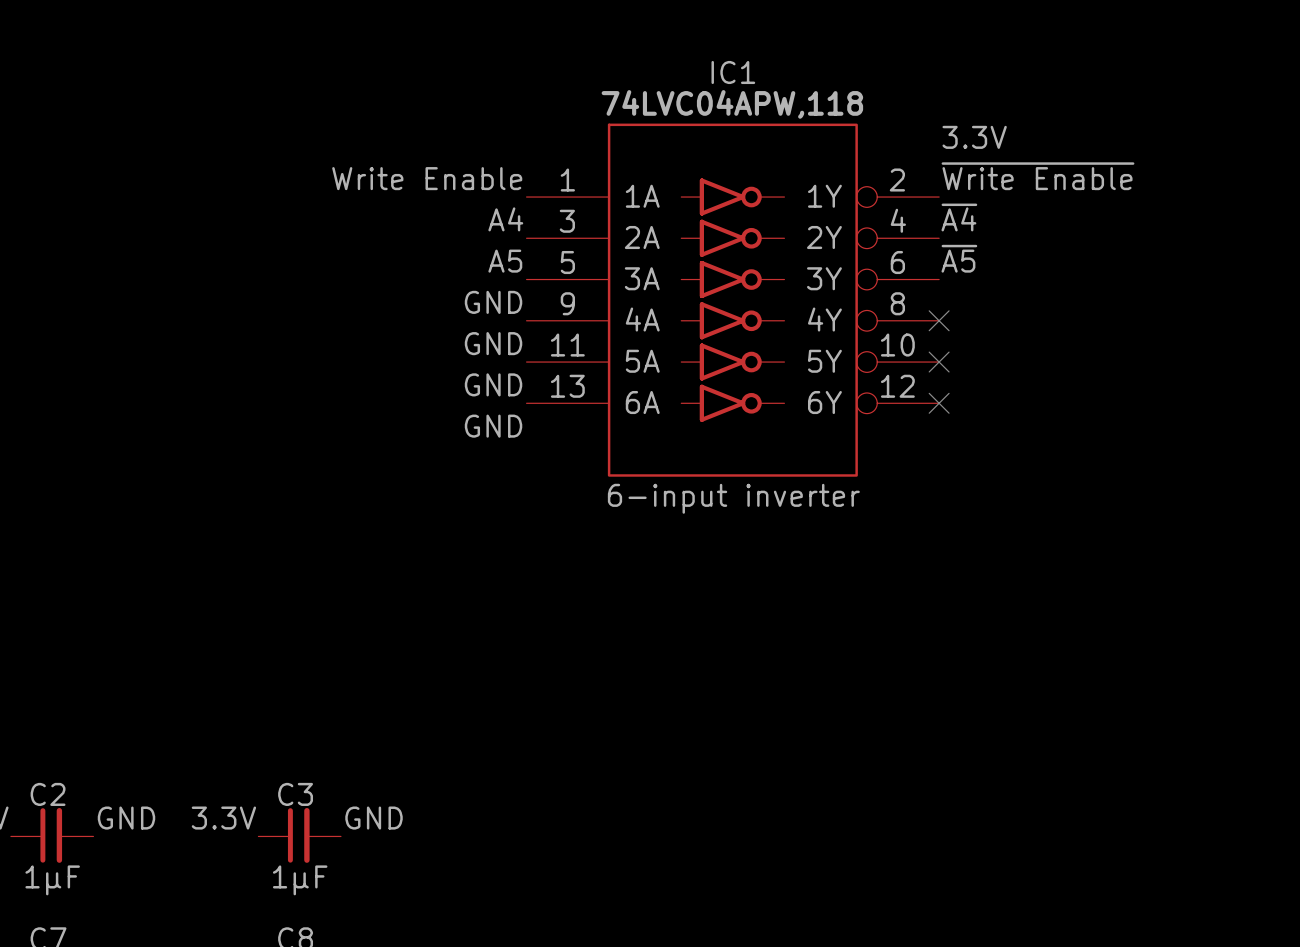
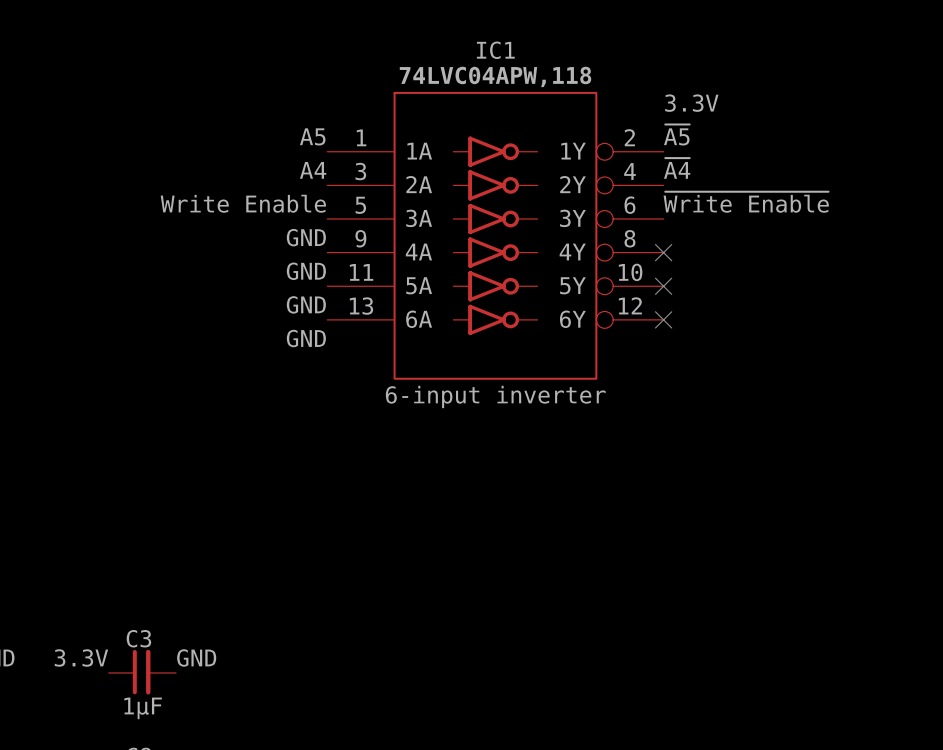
label: ~{Write Enable} (1038, 176) -> ~{A5} (676, 134)
label: Write Enable (427, 178) -> A5 (312, 136)
label: ~{A5} (959, 258) -> ~{Write Enable} (746, 202)
label: A5 (505, 261) -> Write Enable (243, 203)

